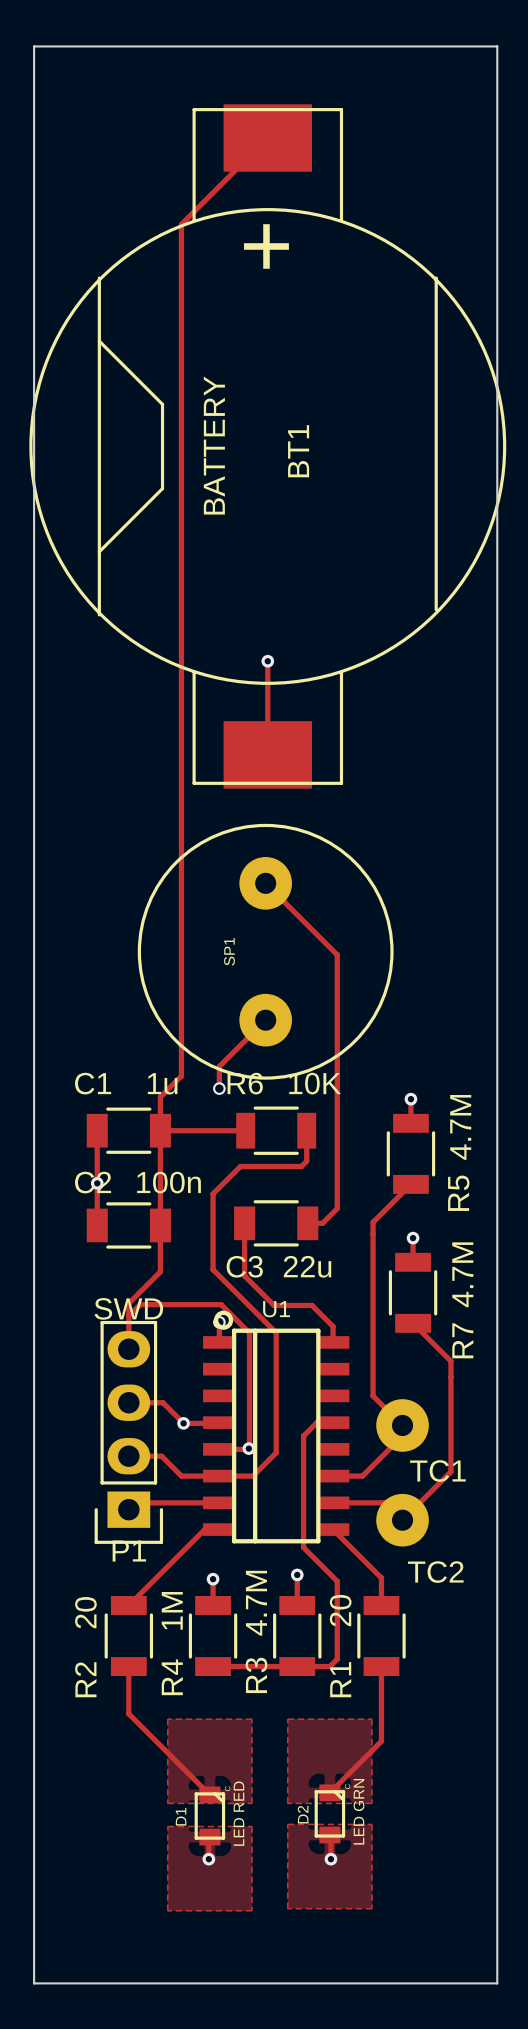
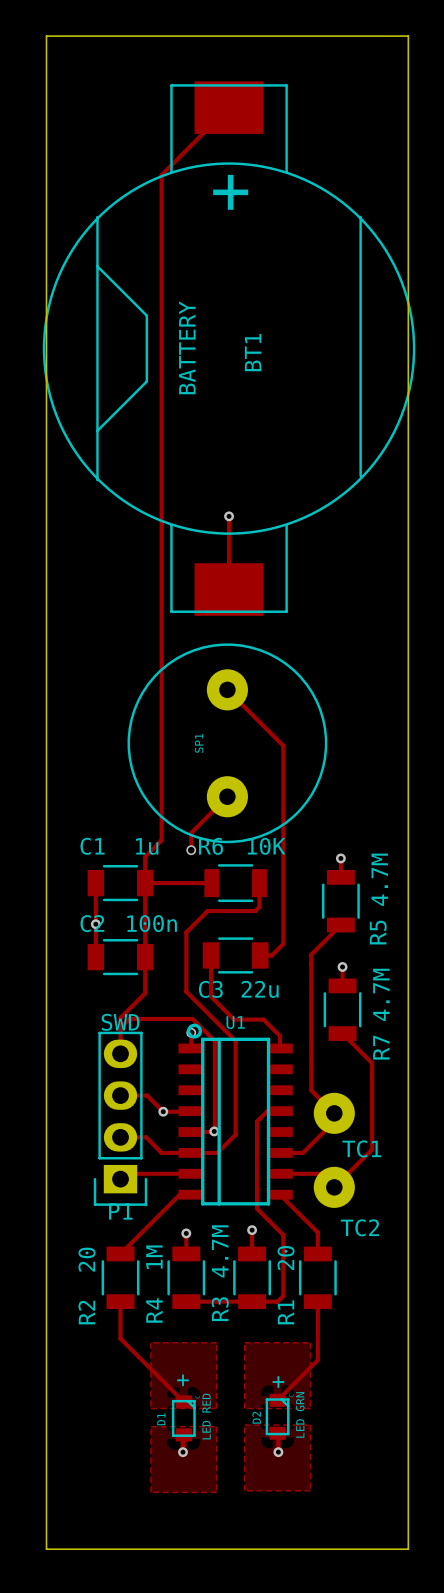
text: none -> + (183, 1380)
text: none -> + (278, 1381)

